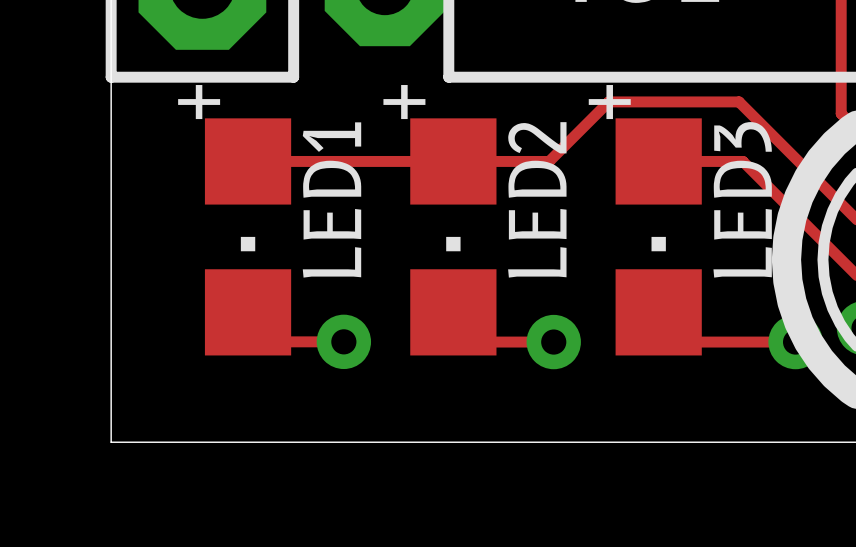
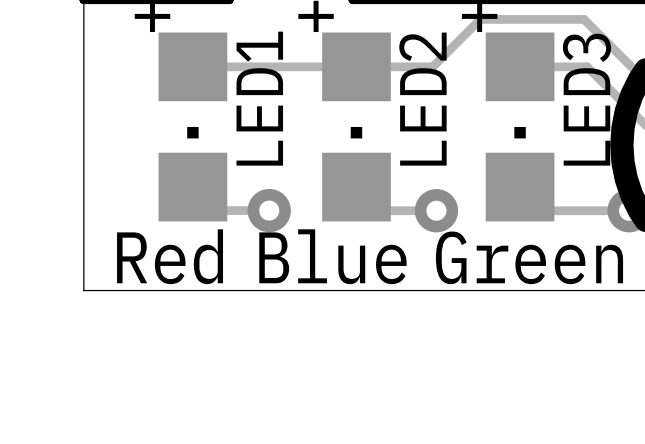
LED1 value: none -> Red (170, 256)
LED2 value: none -> Blue (332, 256)
LED3 value: none -> Green (529, 257)

